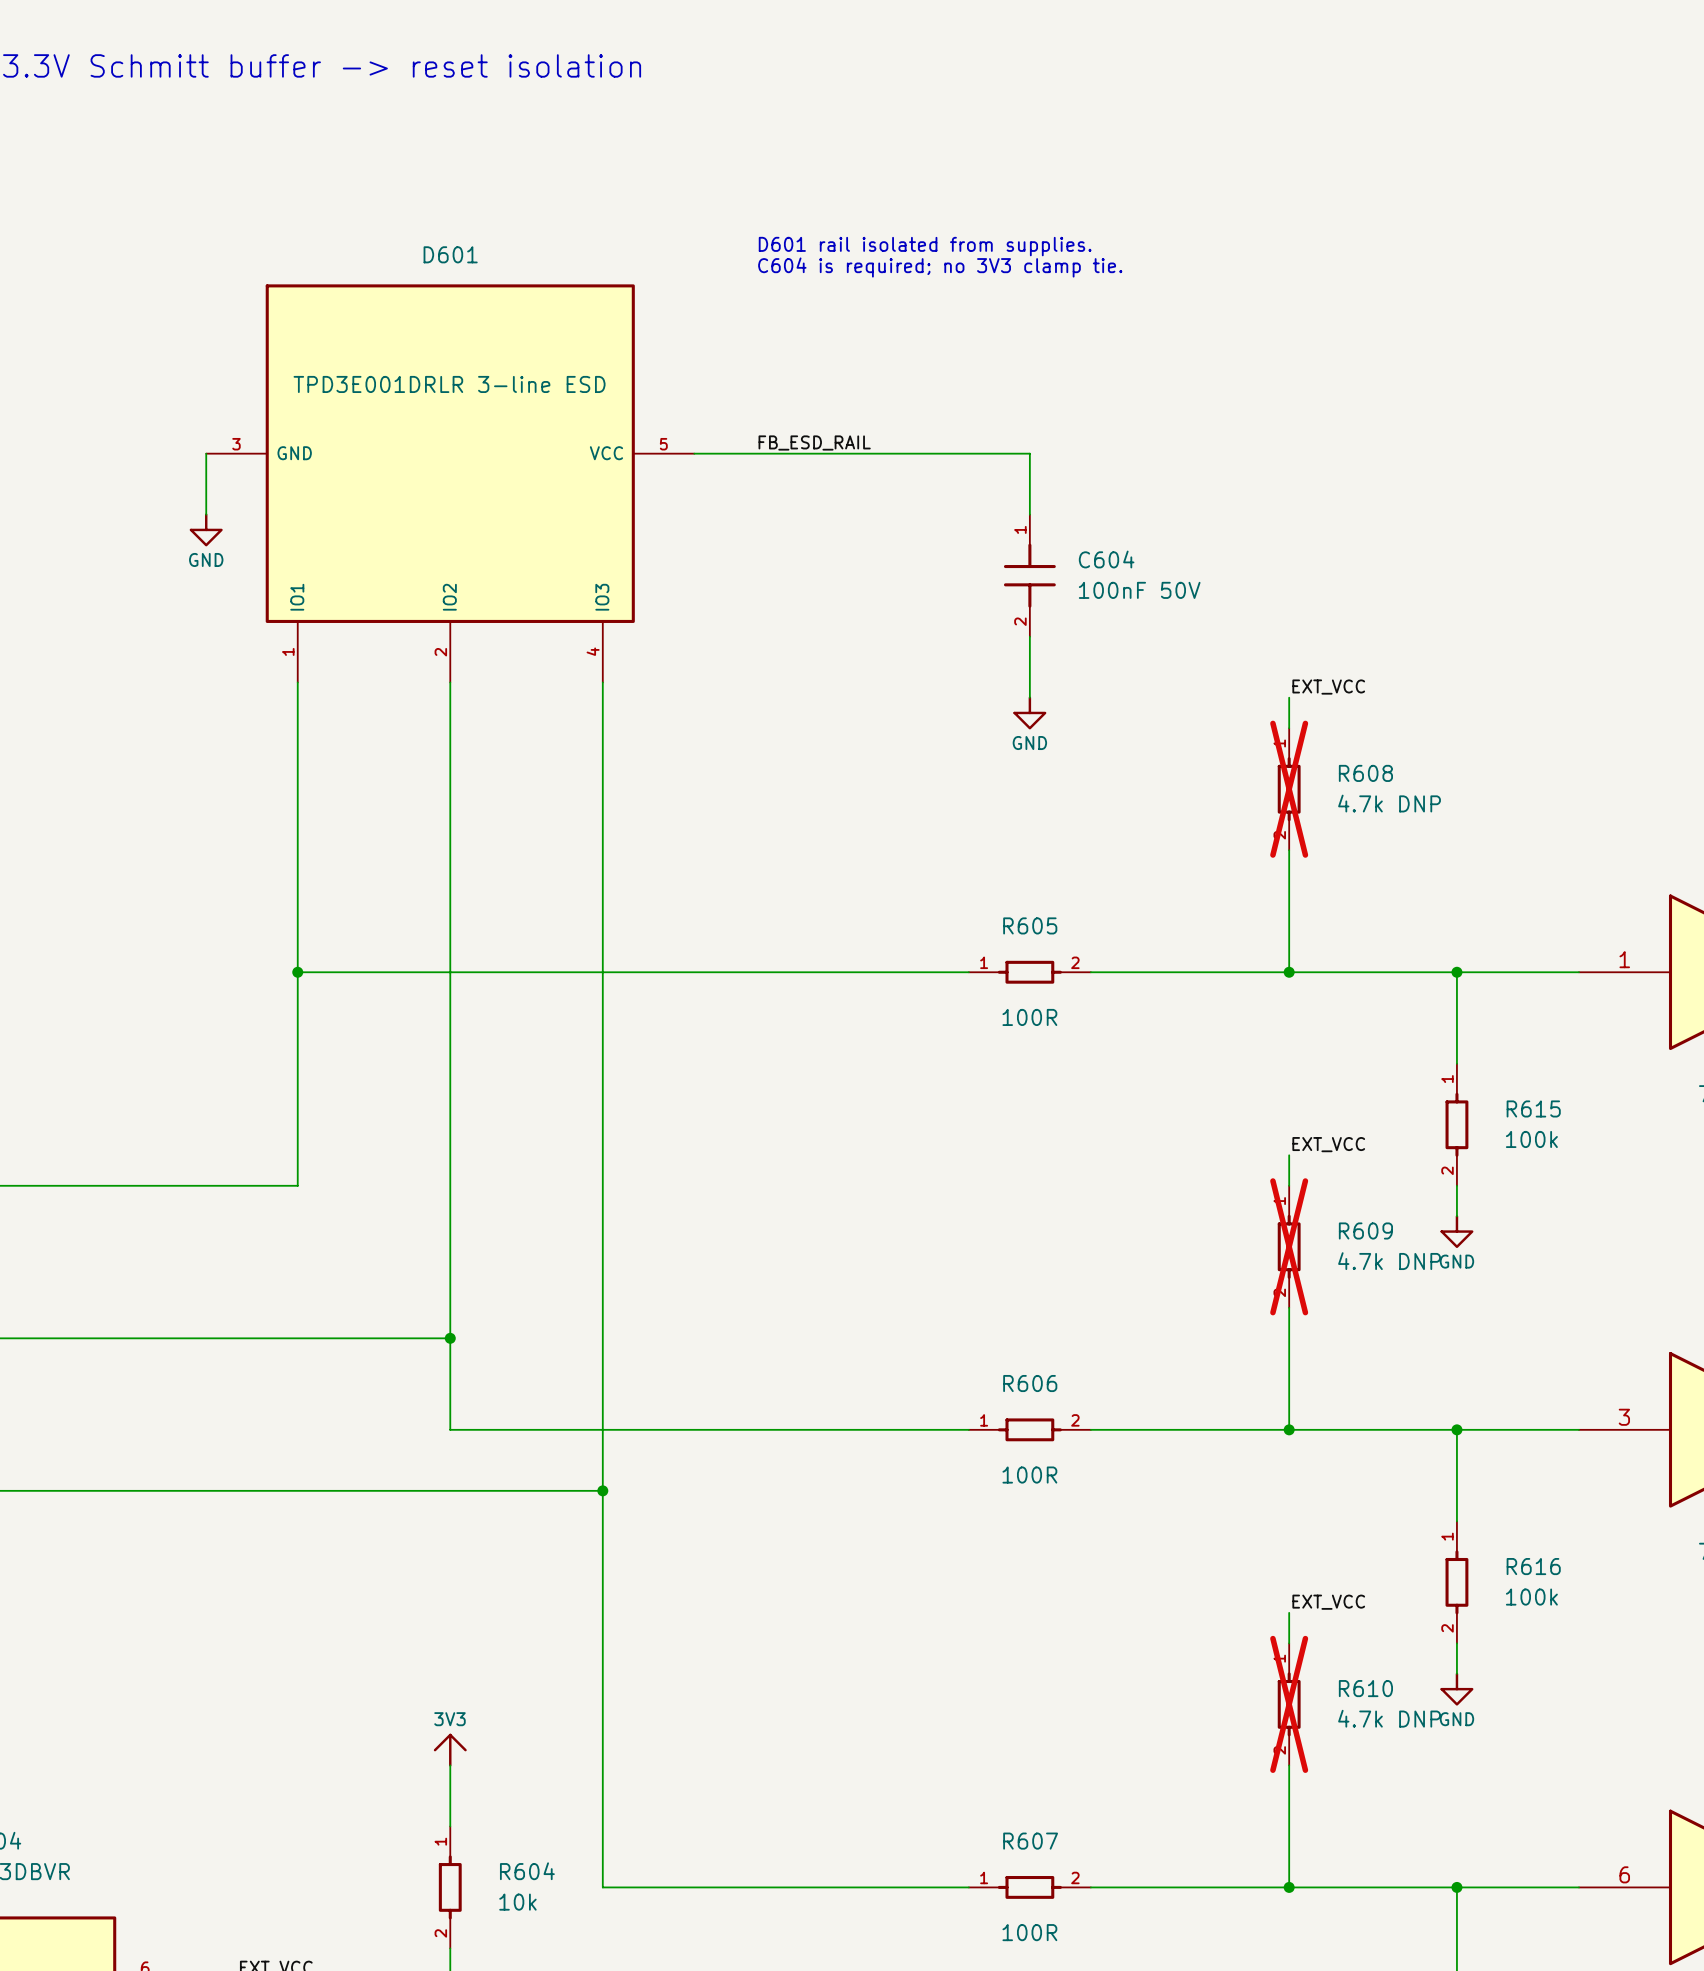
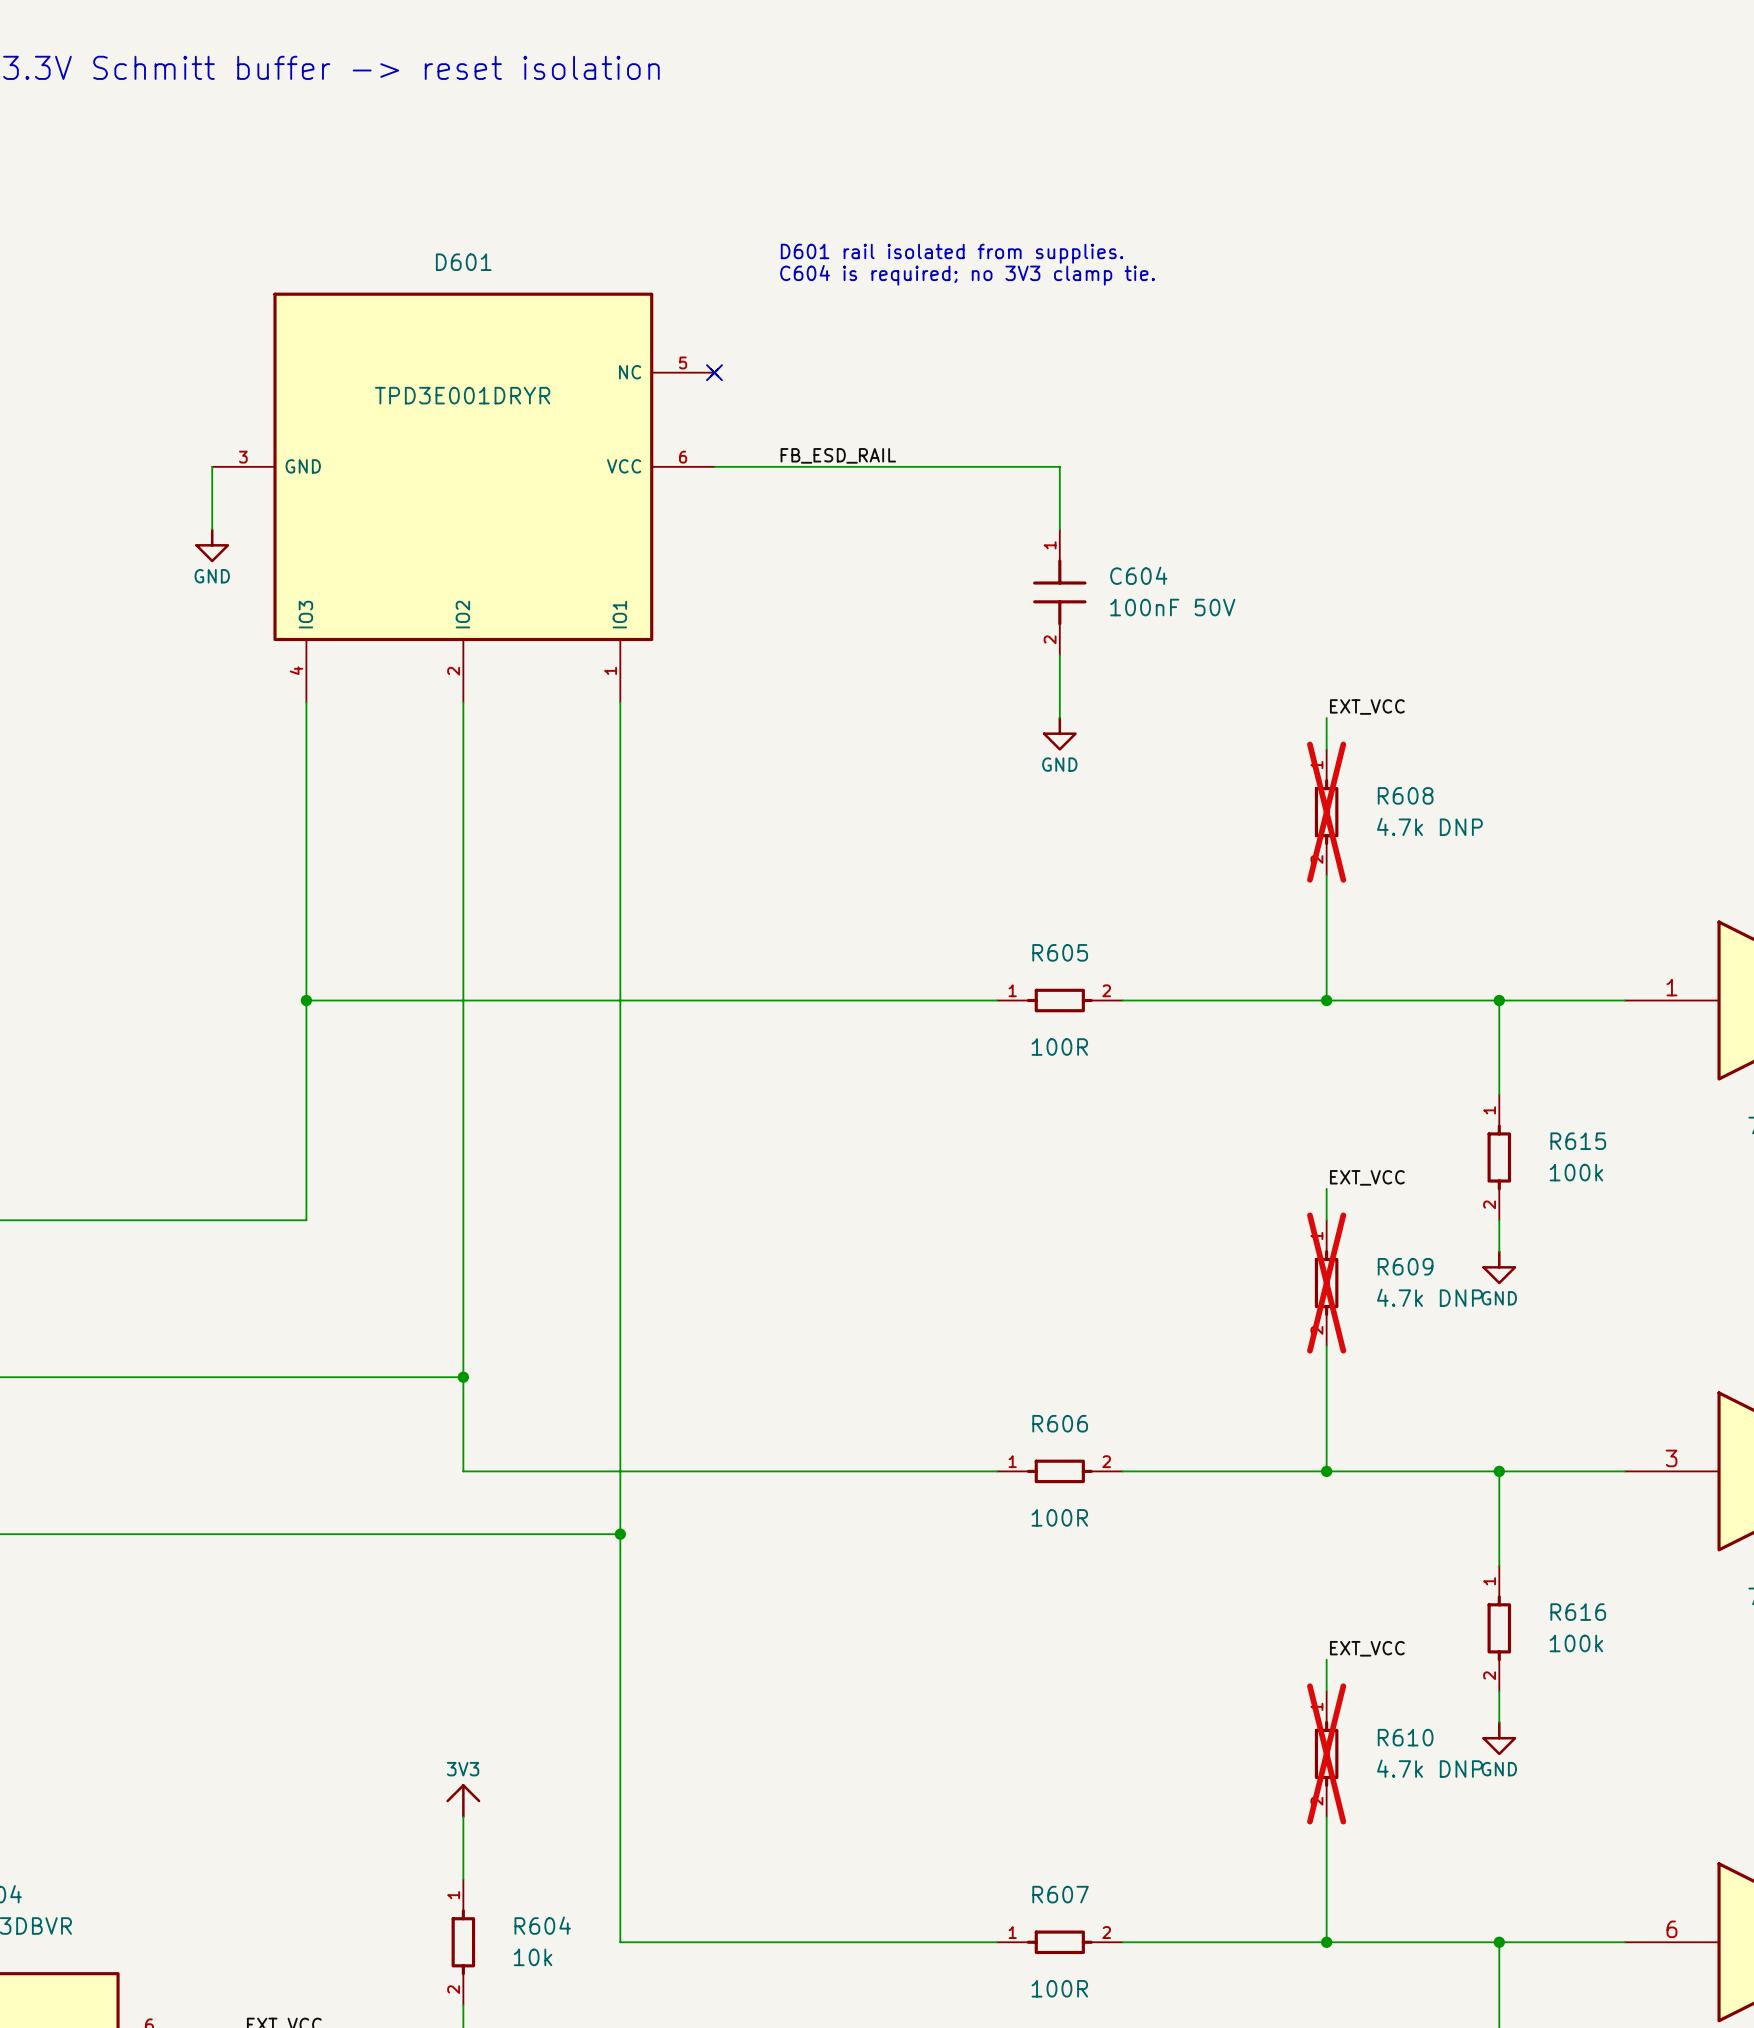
D601 symbol: [206, 284, 695, 683] -> [212, 292, 719, 703]
no-connect mark: none -> (714, 372)
D601 value: TPD3E001DRLR 3-line ESD (449, 384) -> TPD3E001DRYR (462, 395)

